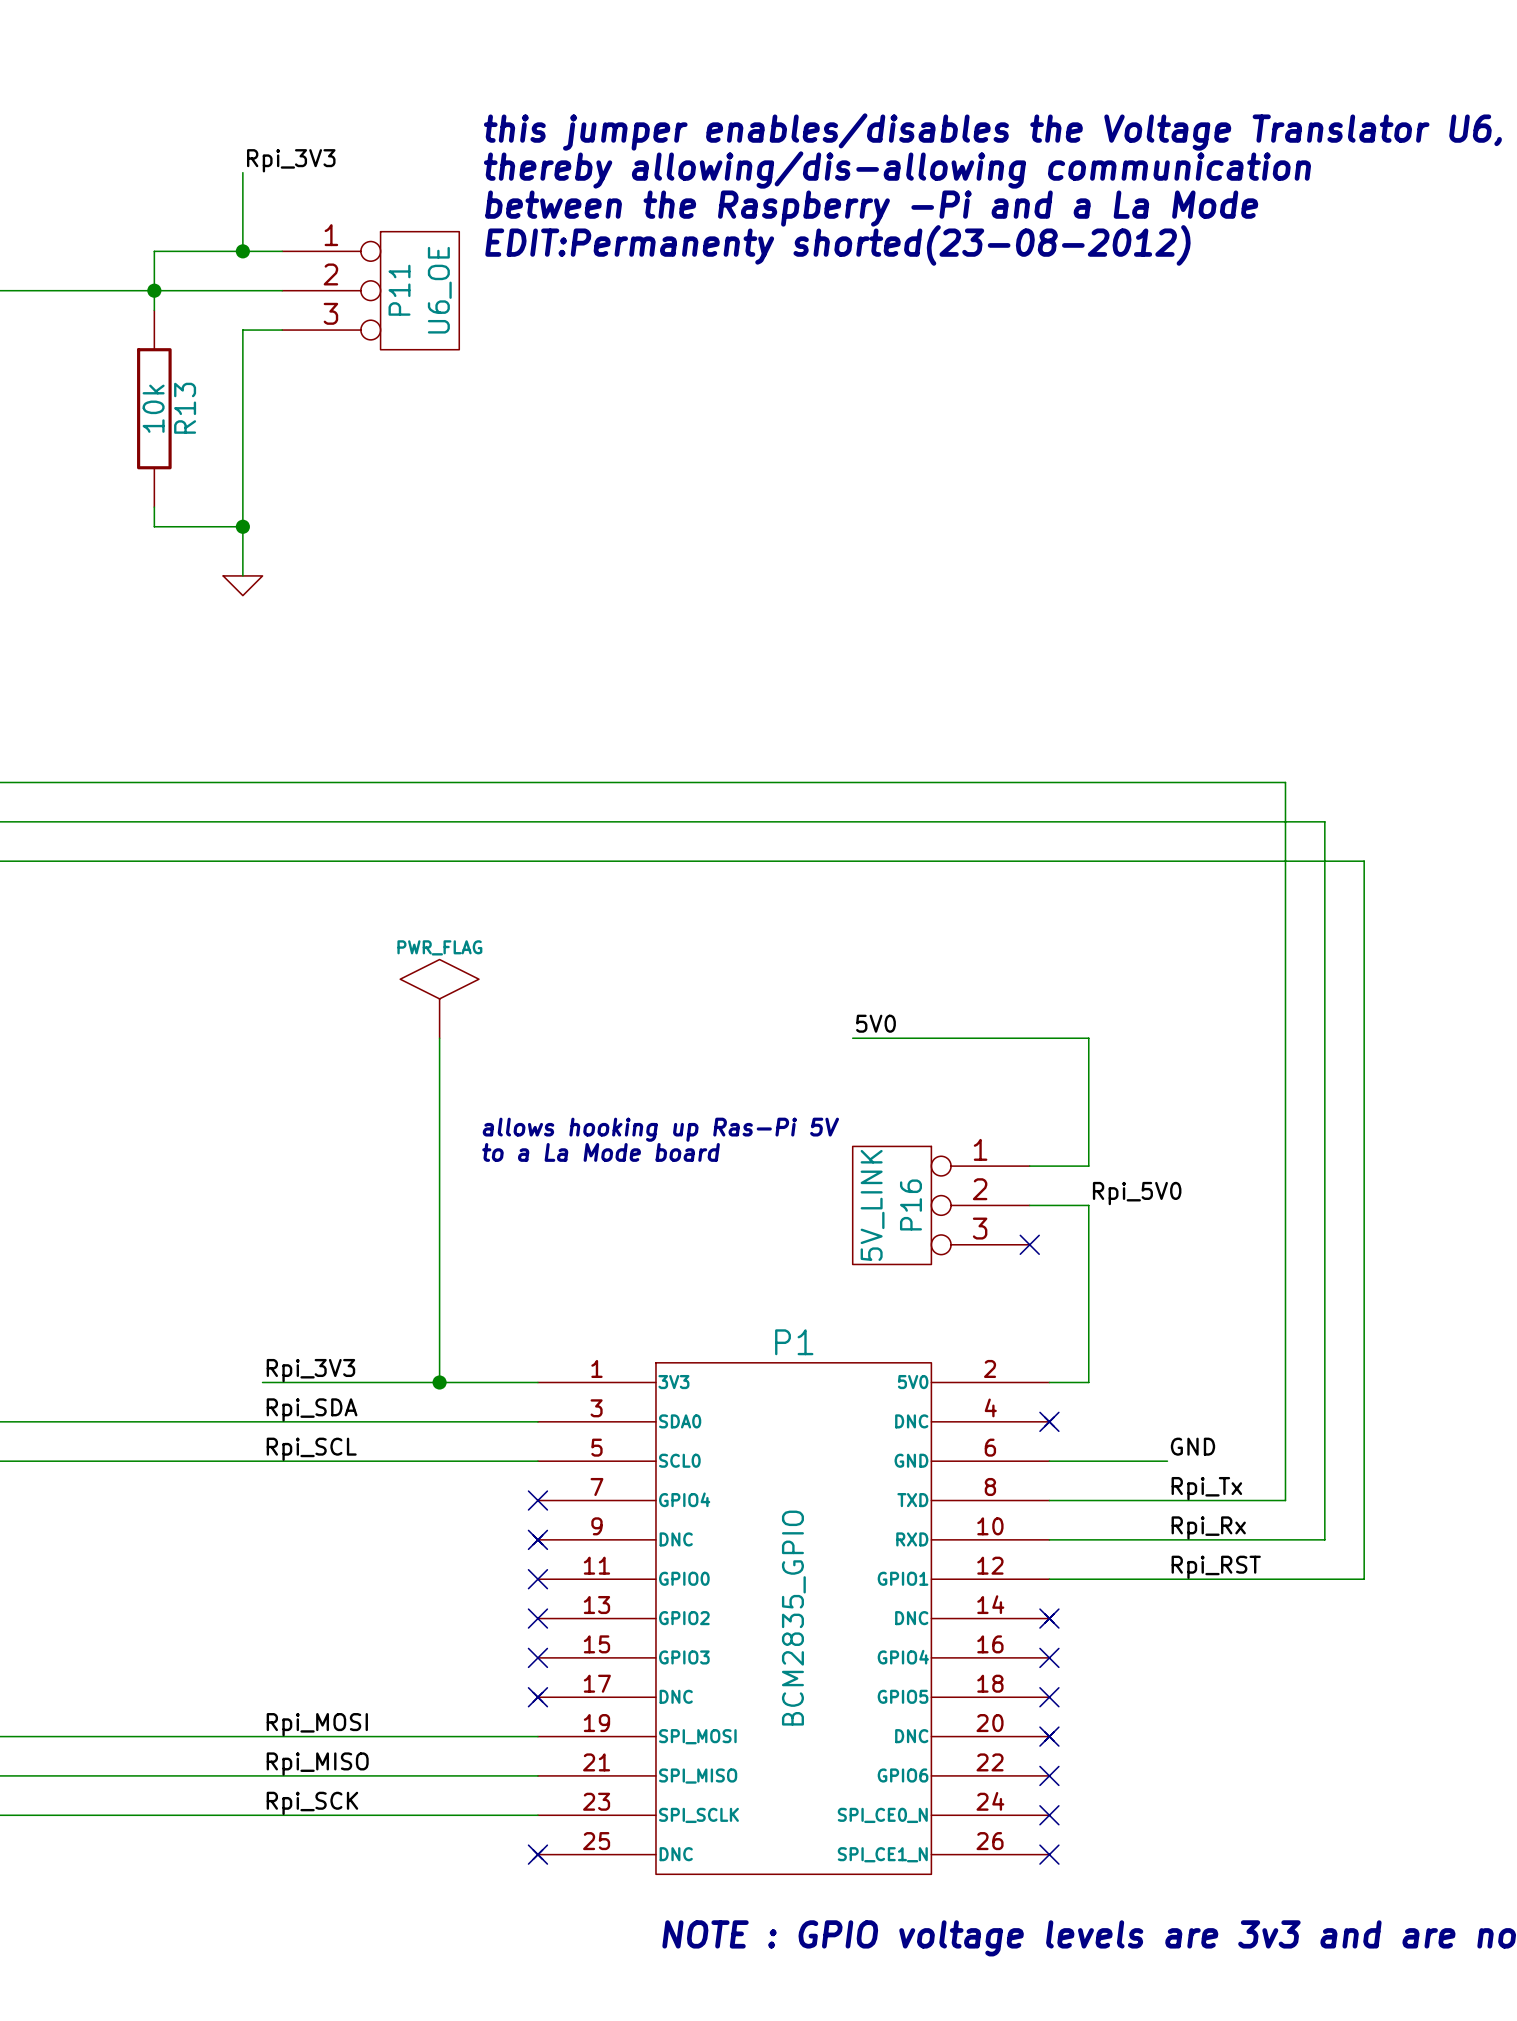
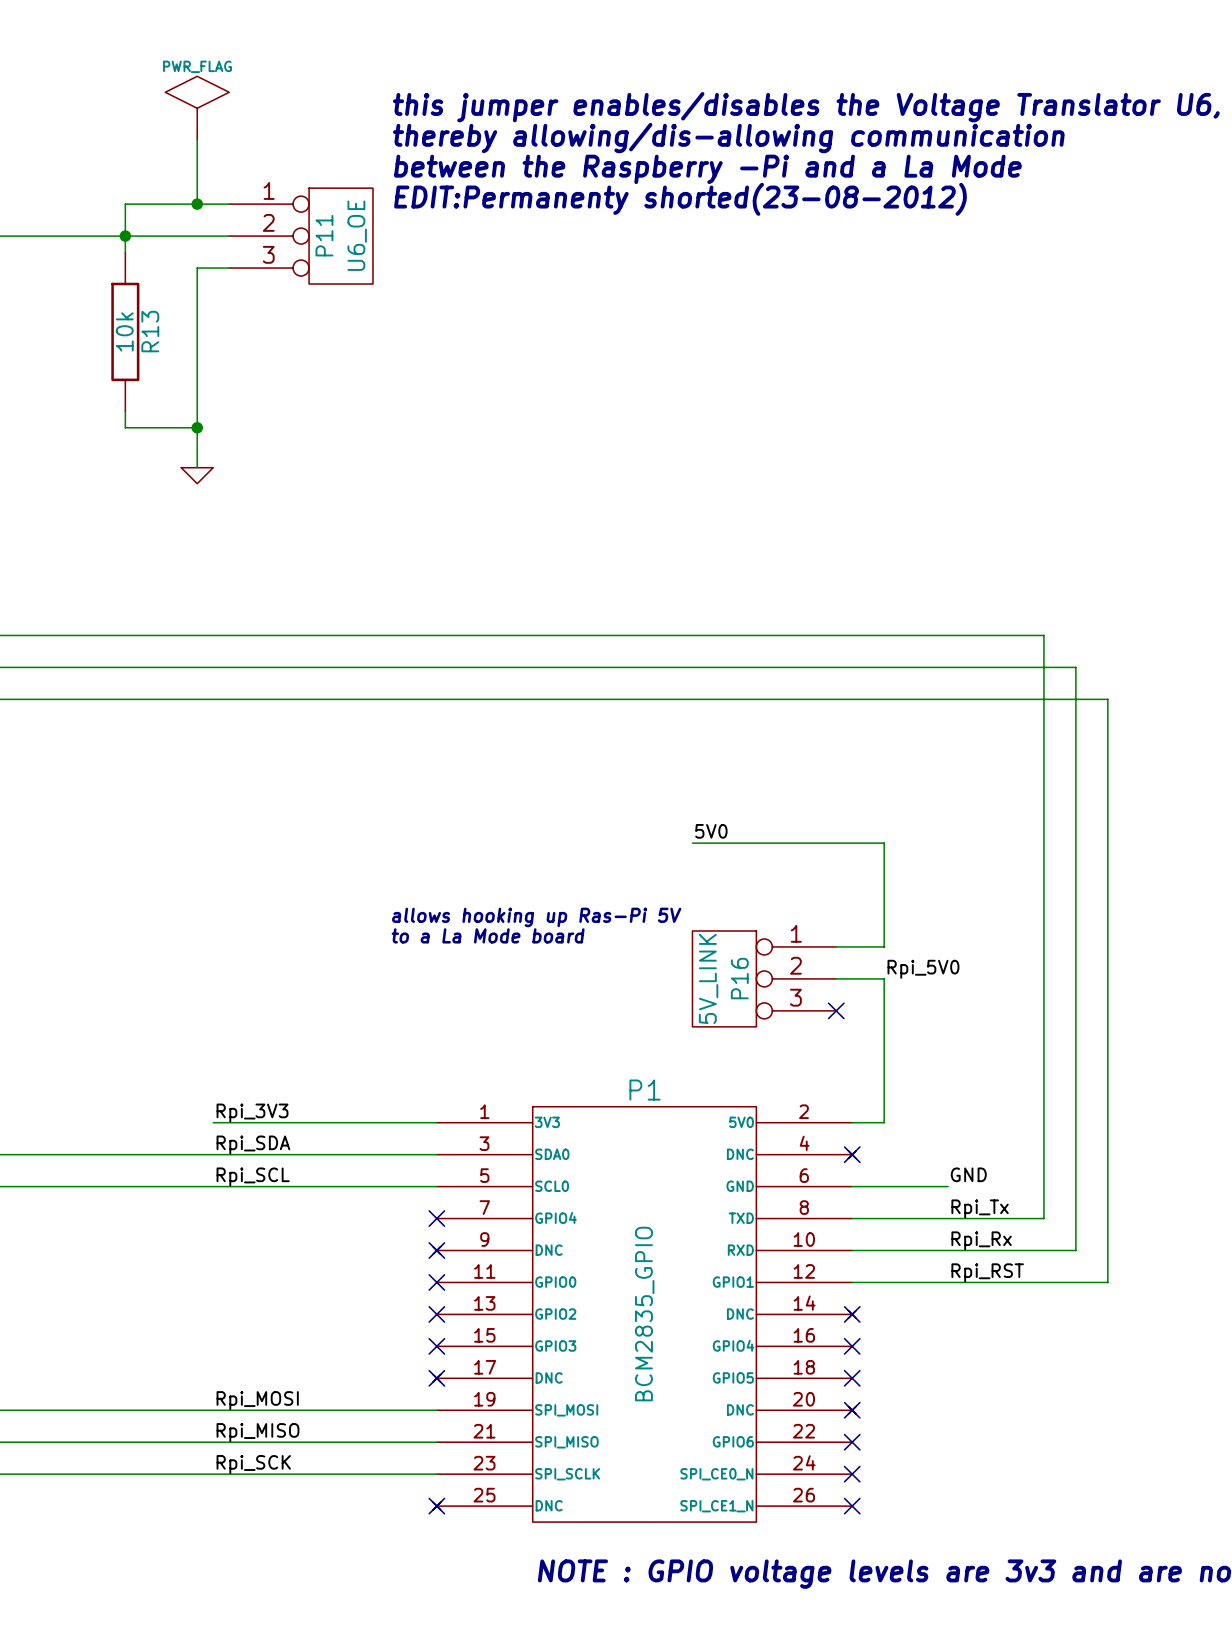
power symbol: none -> PWR_FLAG (197, 108)
label: Rpi_3V3 (291, 160) -> none
power symbol: PWR_FLAG (439, 998) -> none
wire: (439, 1038) (439, 1382) -> none
junction: (439, 1382) -> none

